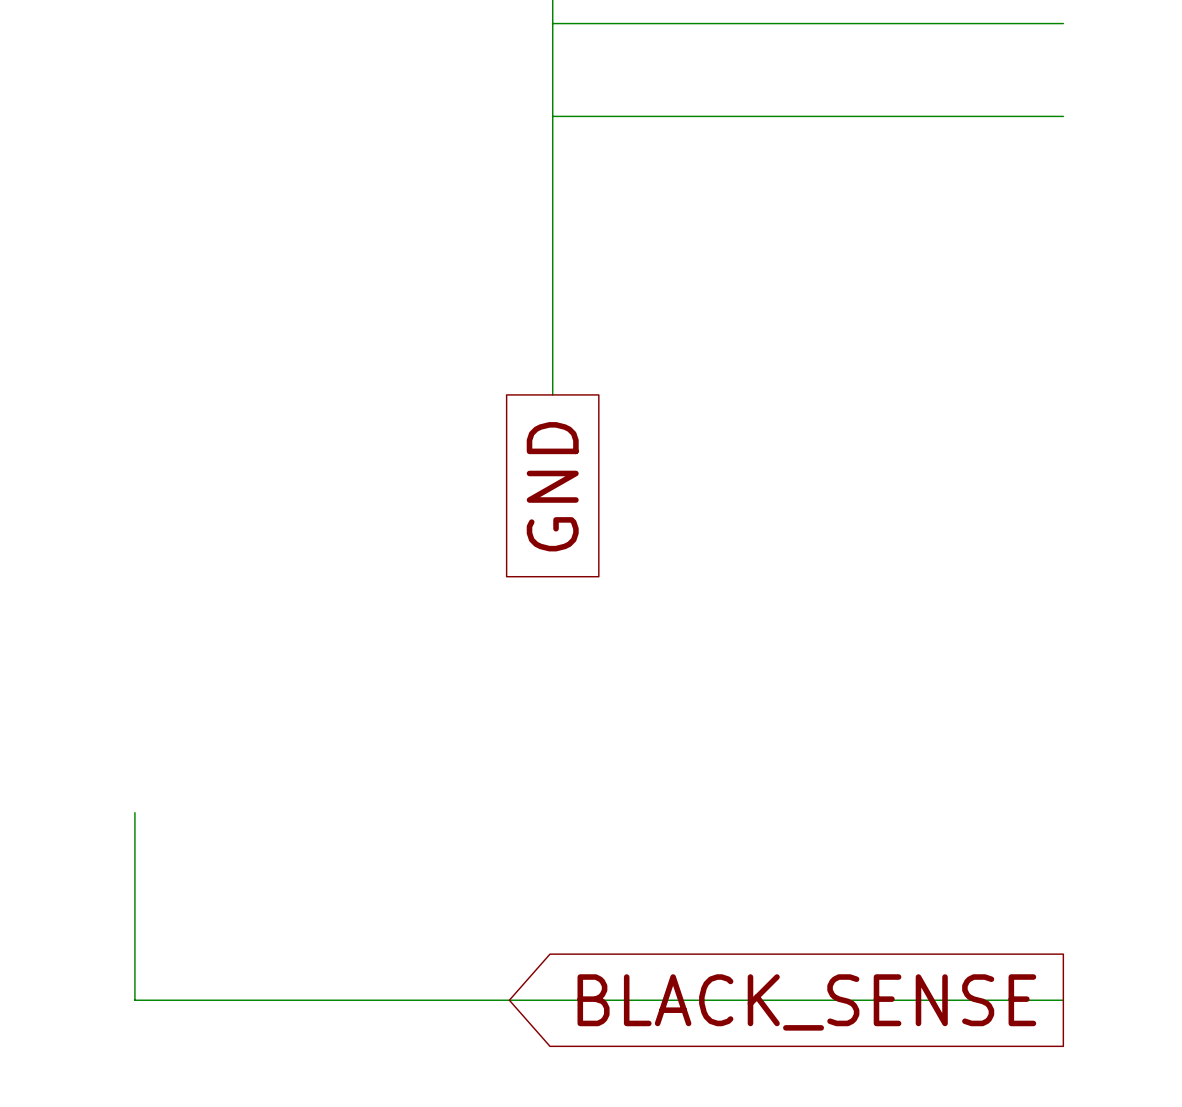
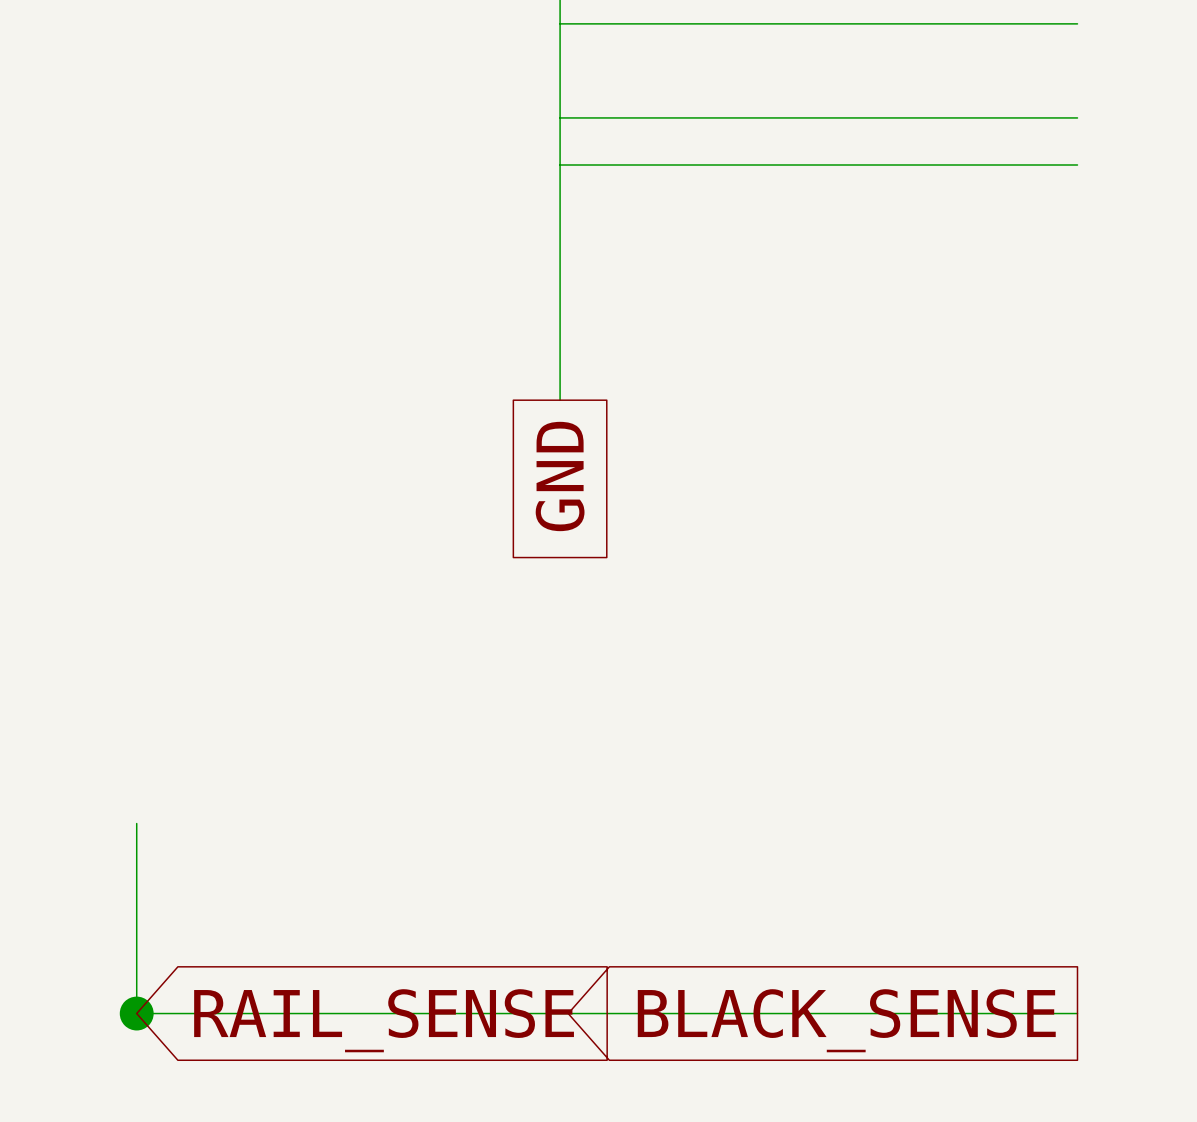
wire: none -> (560, 164) (1077, 164)
junction: none -> (136, 1013)
global label: none -> RAIL_SENSE (384, 1020)

